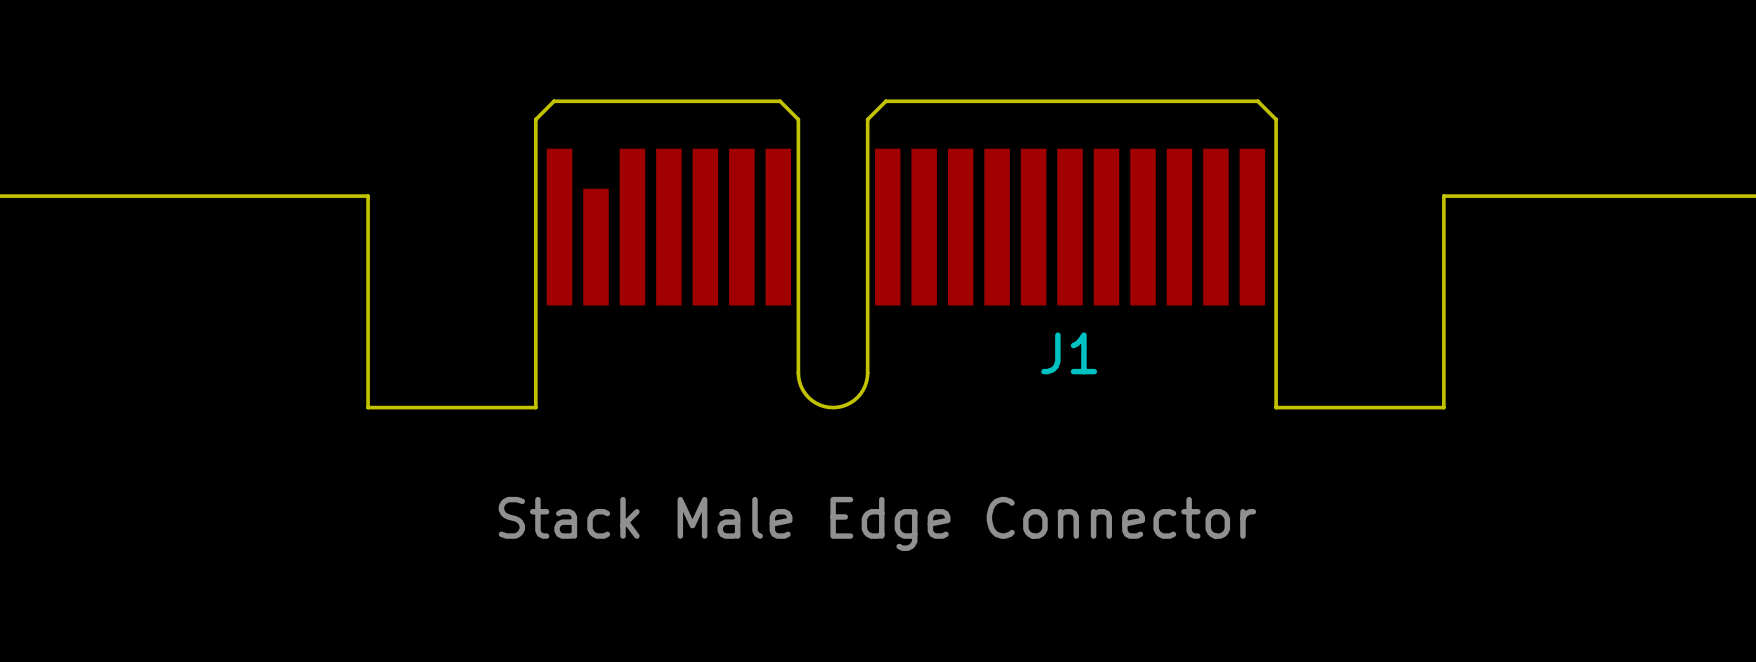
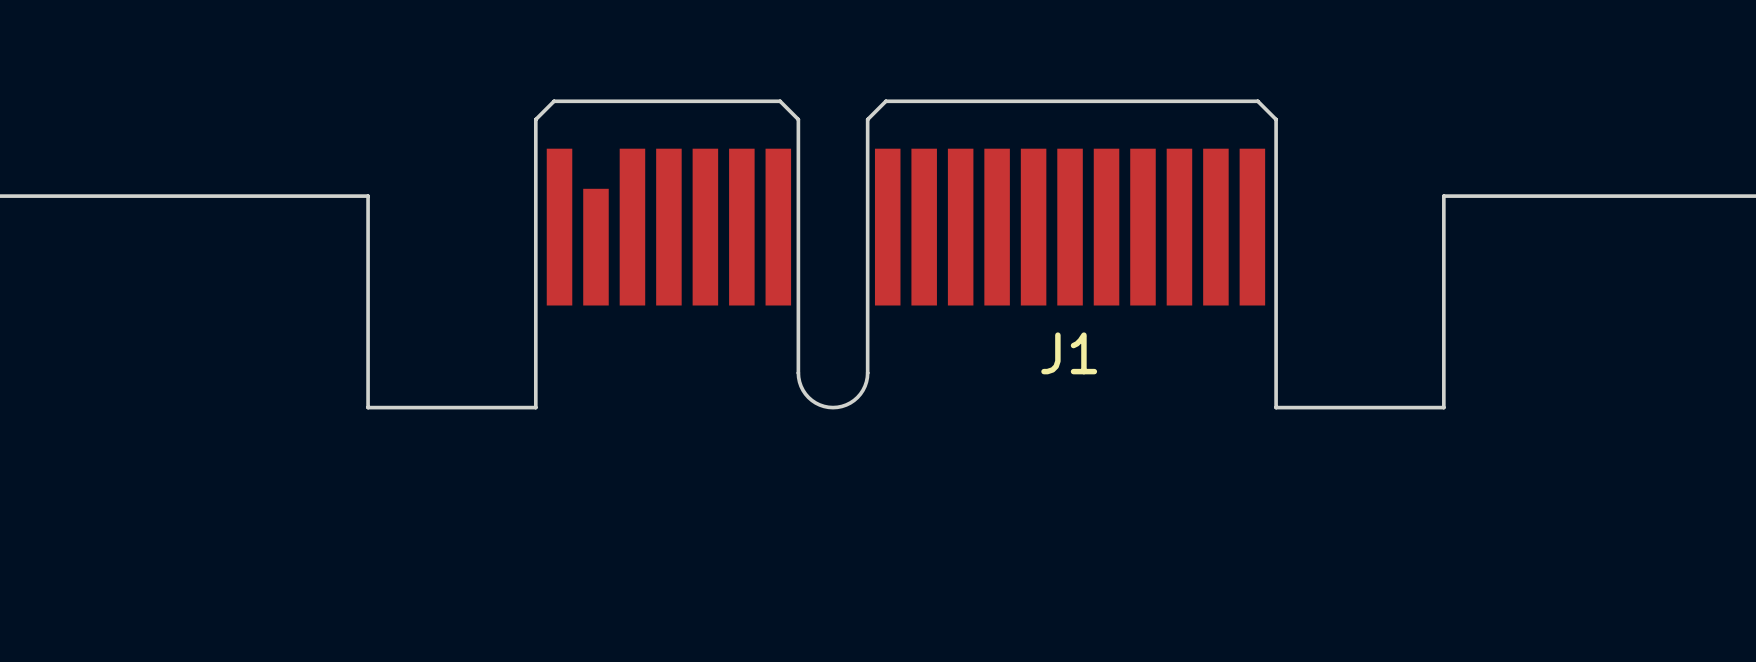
J1 value: Stack Male Edge Connector (877, 523) -> none

